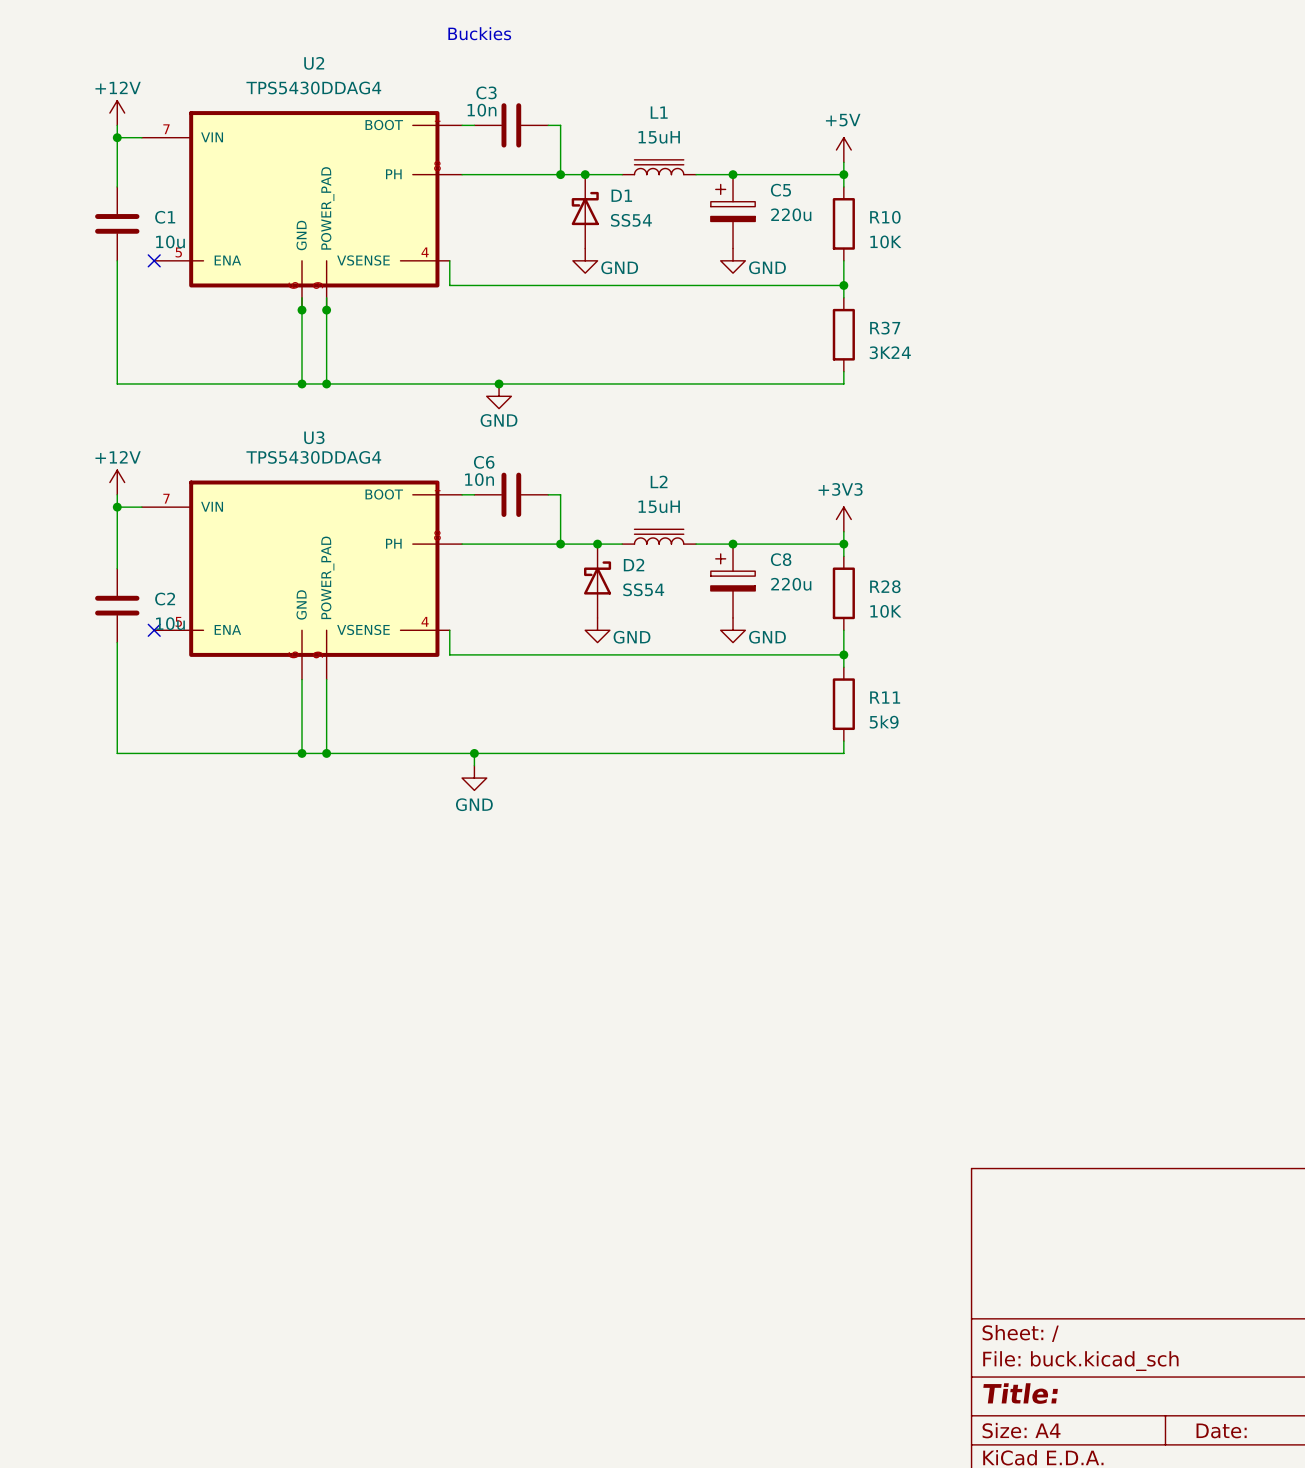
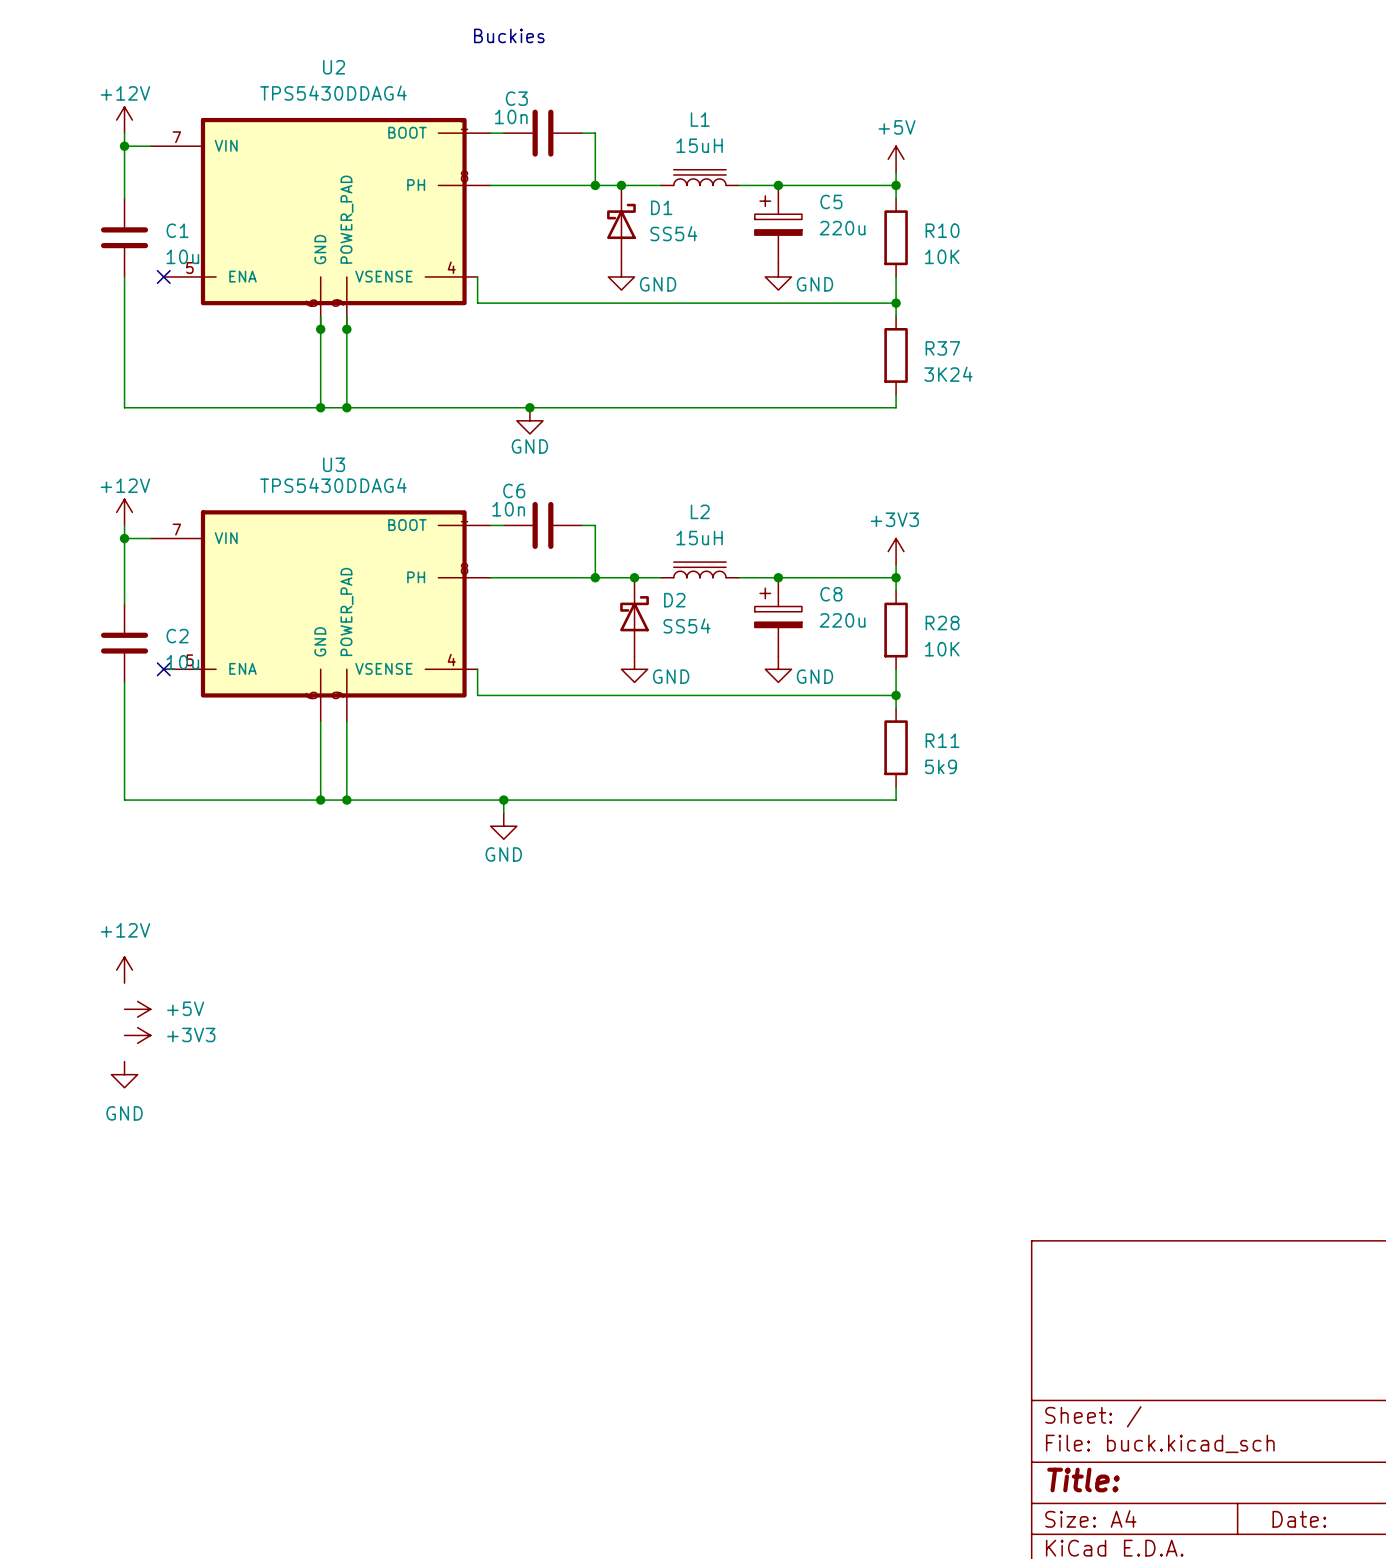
power symbol: none -> +12V (124, 970)
power symbol: none -> +5V (137, 1009)
power symbol: none -> +3V3 (137, 1035)
power symbol: none -> GND (124, 1074)

